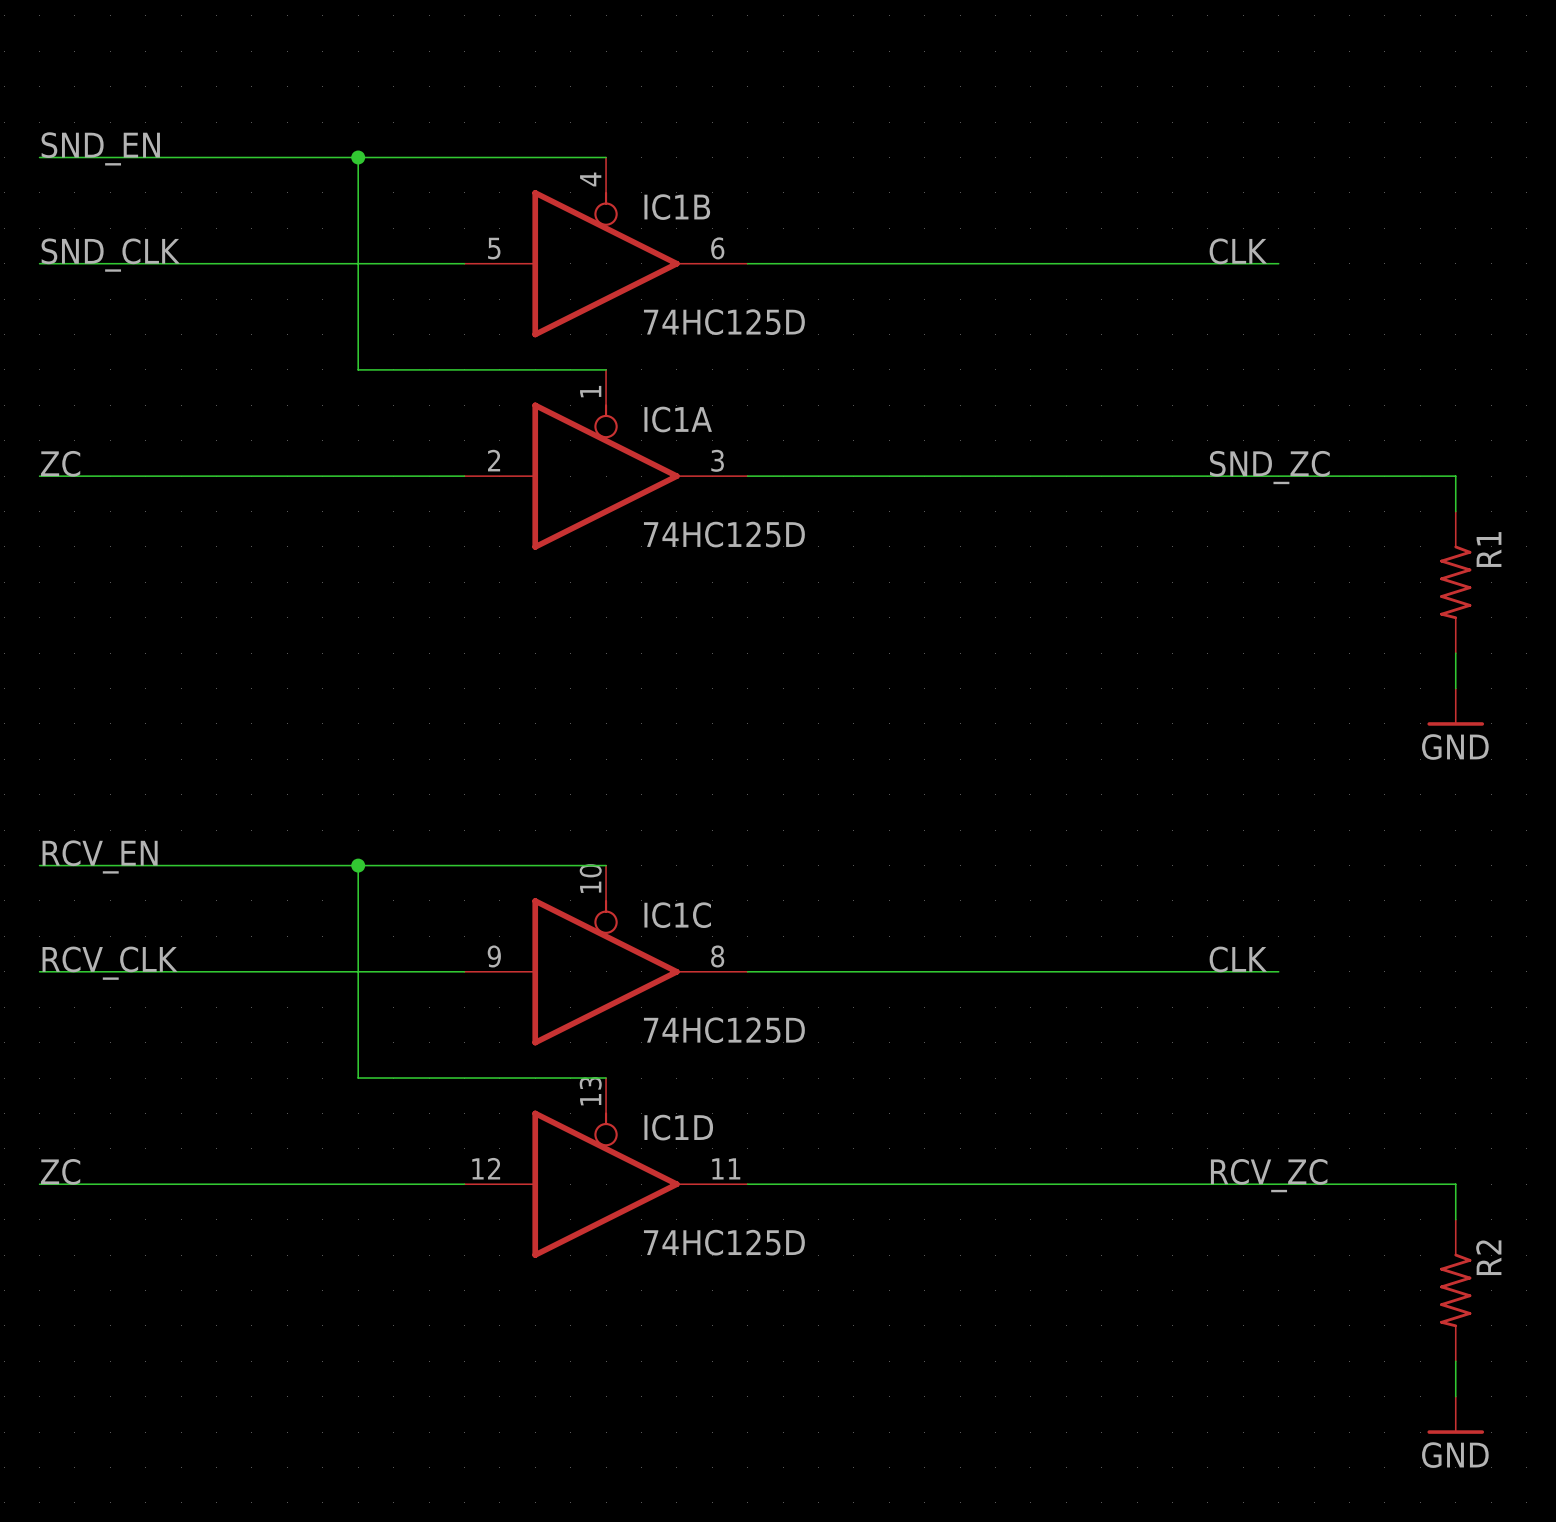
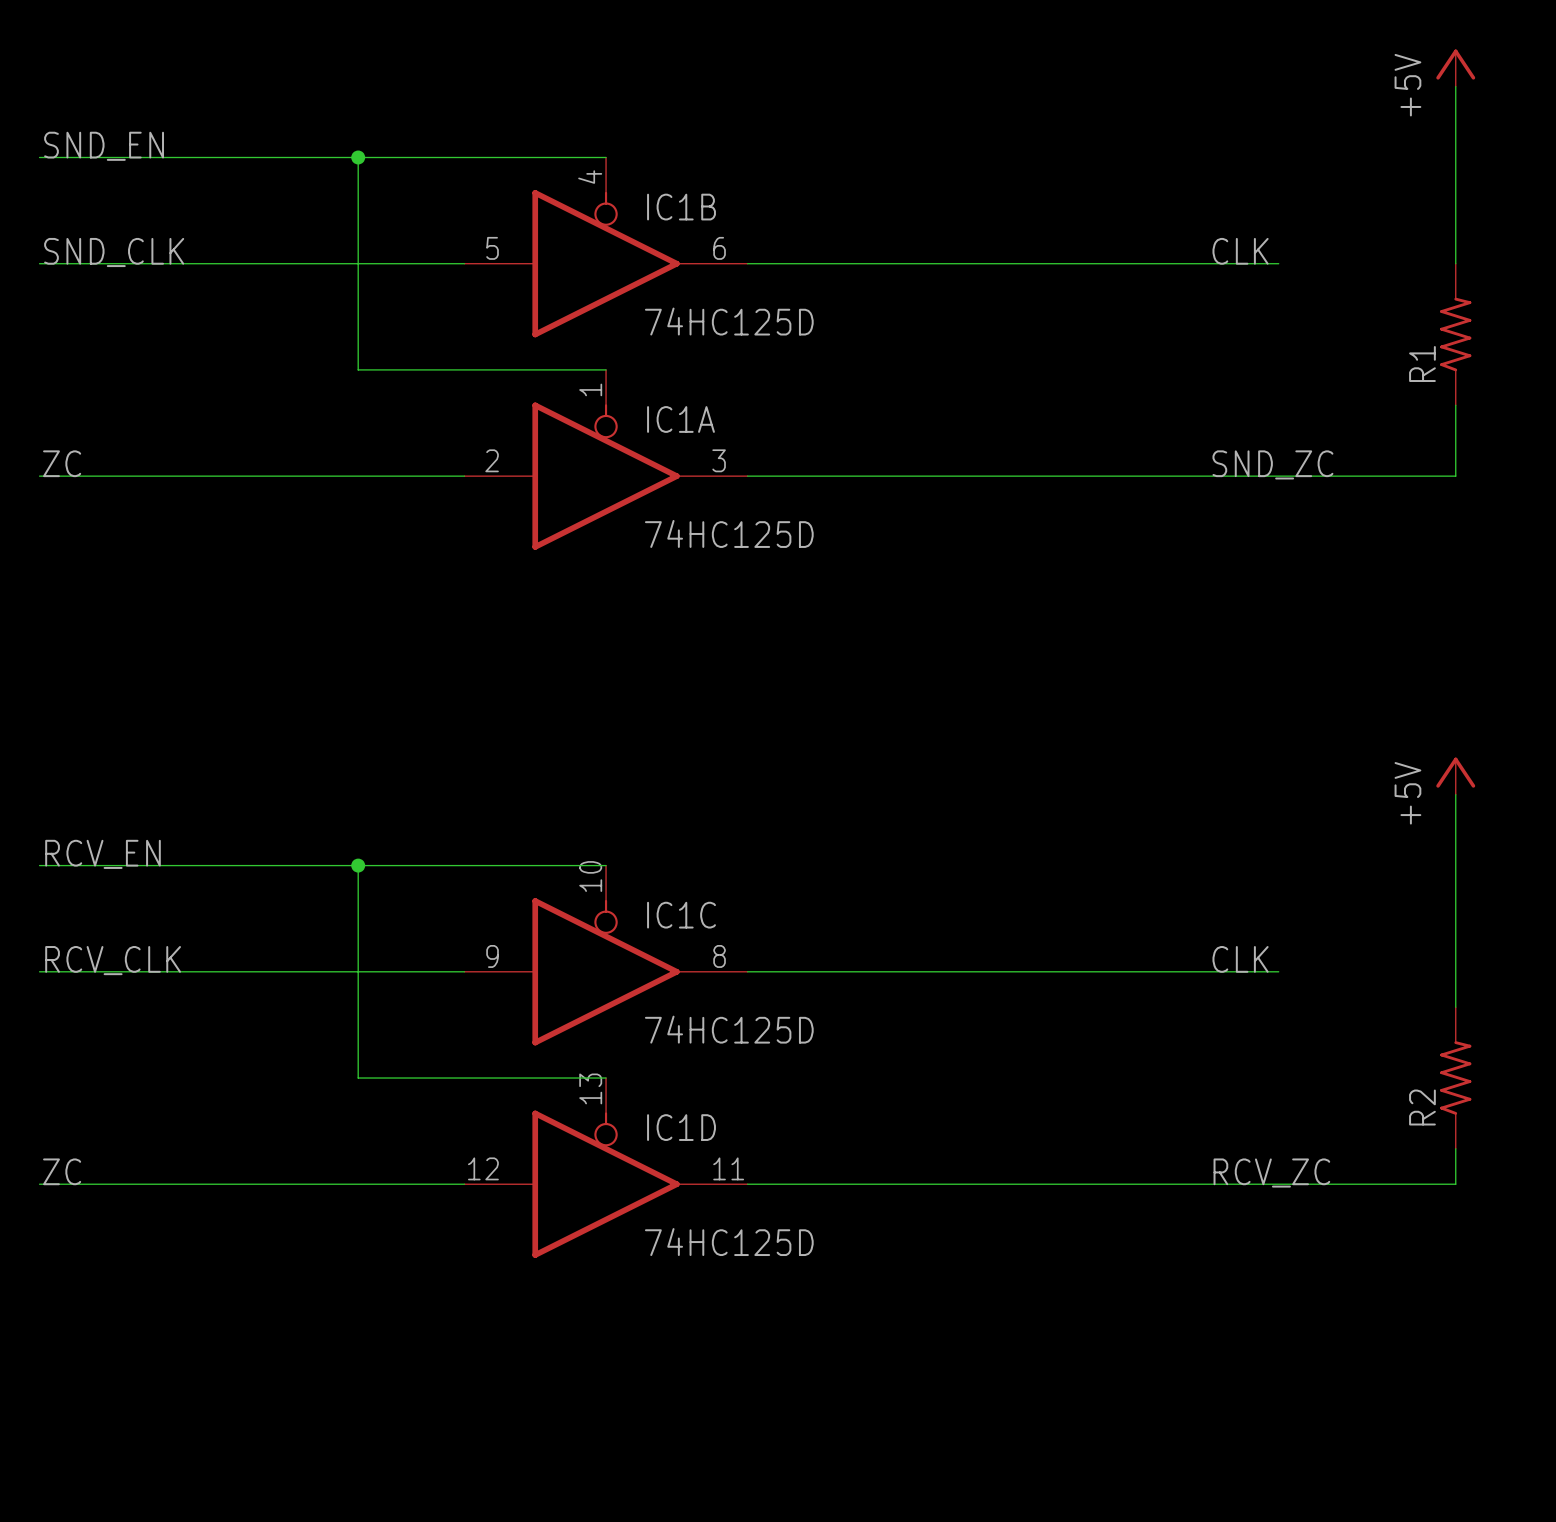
power symbol: none -> +5V (1455, 68)
wire: none -> (1455, 86) (1455, 263)
wire: (1455, 476) (1455, 511) -> (1455, 476) (1455, 405)
R1 rotation: 0° (1455, 582) -> 180° (1455, 334)
R1 position: (1455, 582) -> (1455, 334)
wire: (1455, 653) (1455, 688) -> none
power symbol: GND (1455, 707) -> none
power symbol: none -> +5V (1455, 776)
wire: none -> (1455, 794) (1455, 1007)
wire: (1455, 1184) (1455, 1219) -> (1455, 1184) (1455, 1148)
R2 rotation: 0° (1455, 1290) -> 180° (1455, 1078)
R2 position: (1455, 1290) -> (1455, 1078)
wire: (1455, 1361) (1455, 1396) -> none
power symbol: GND (1455, 1415) -> none

